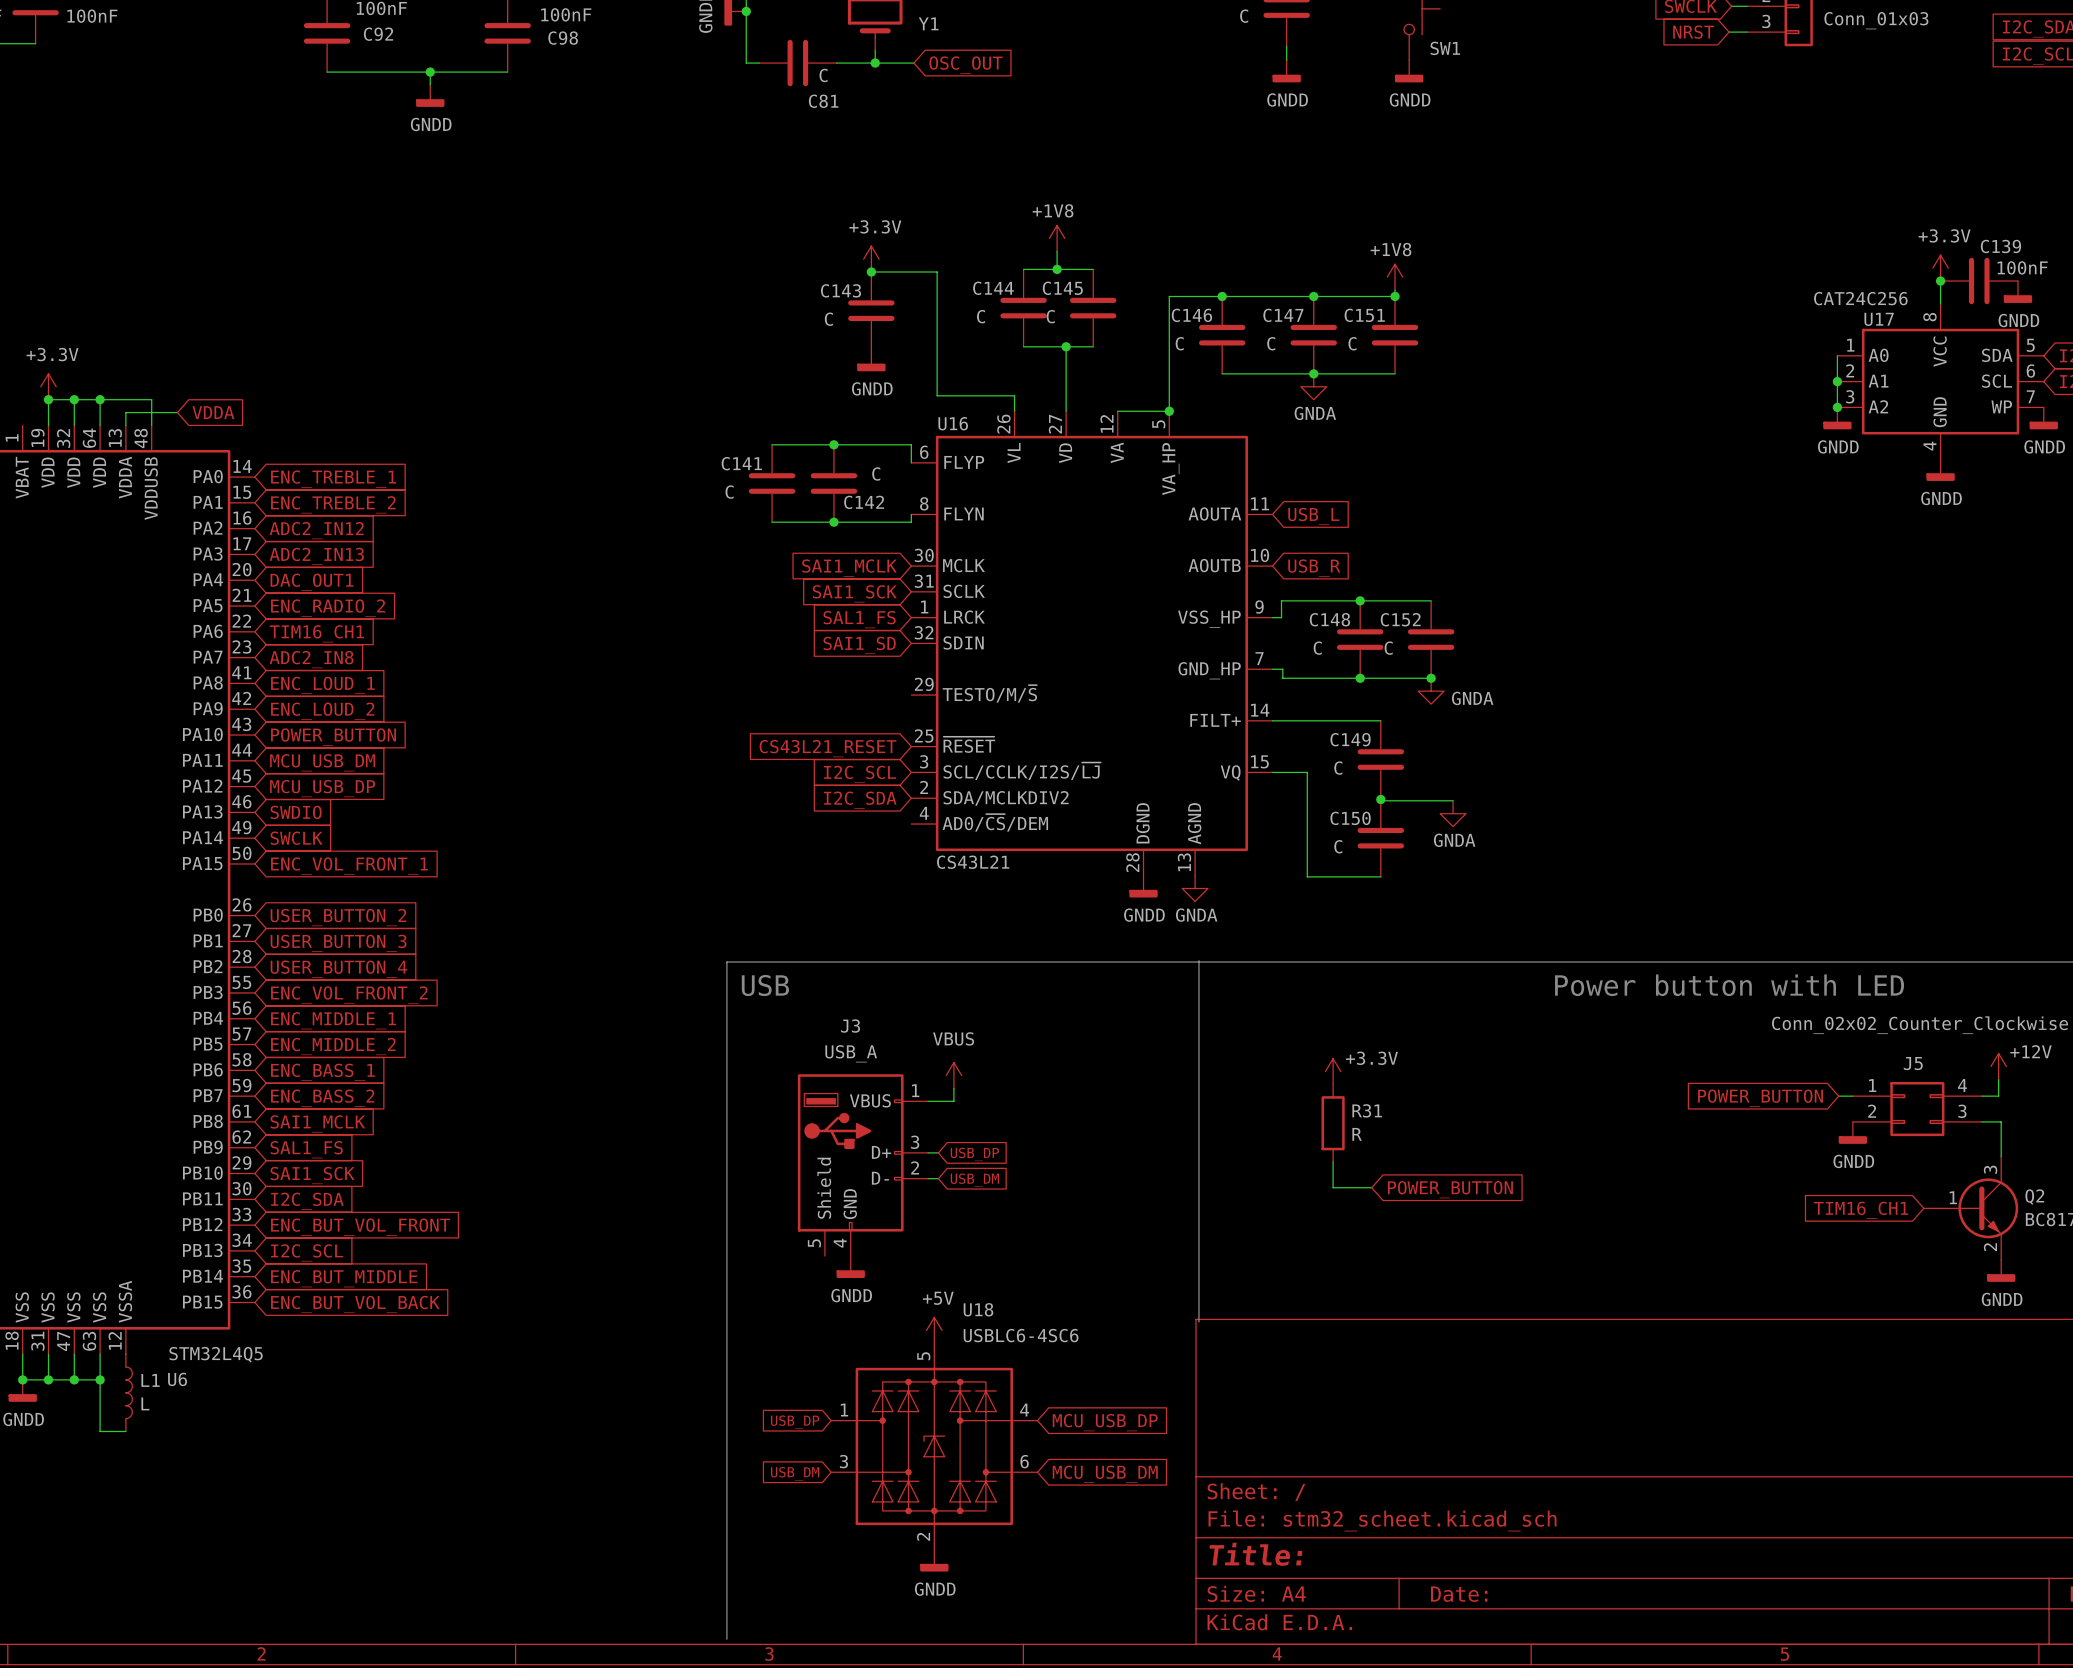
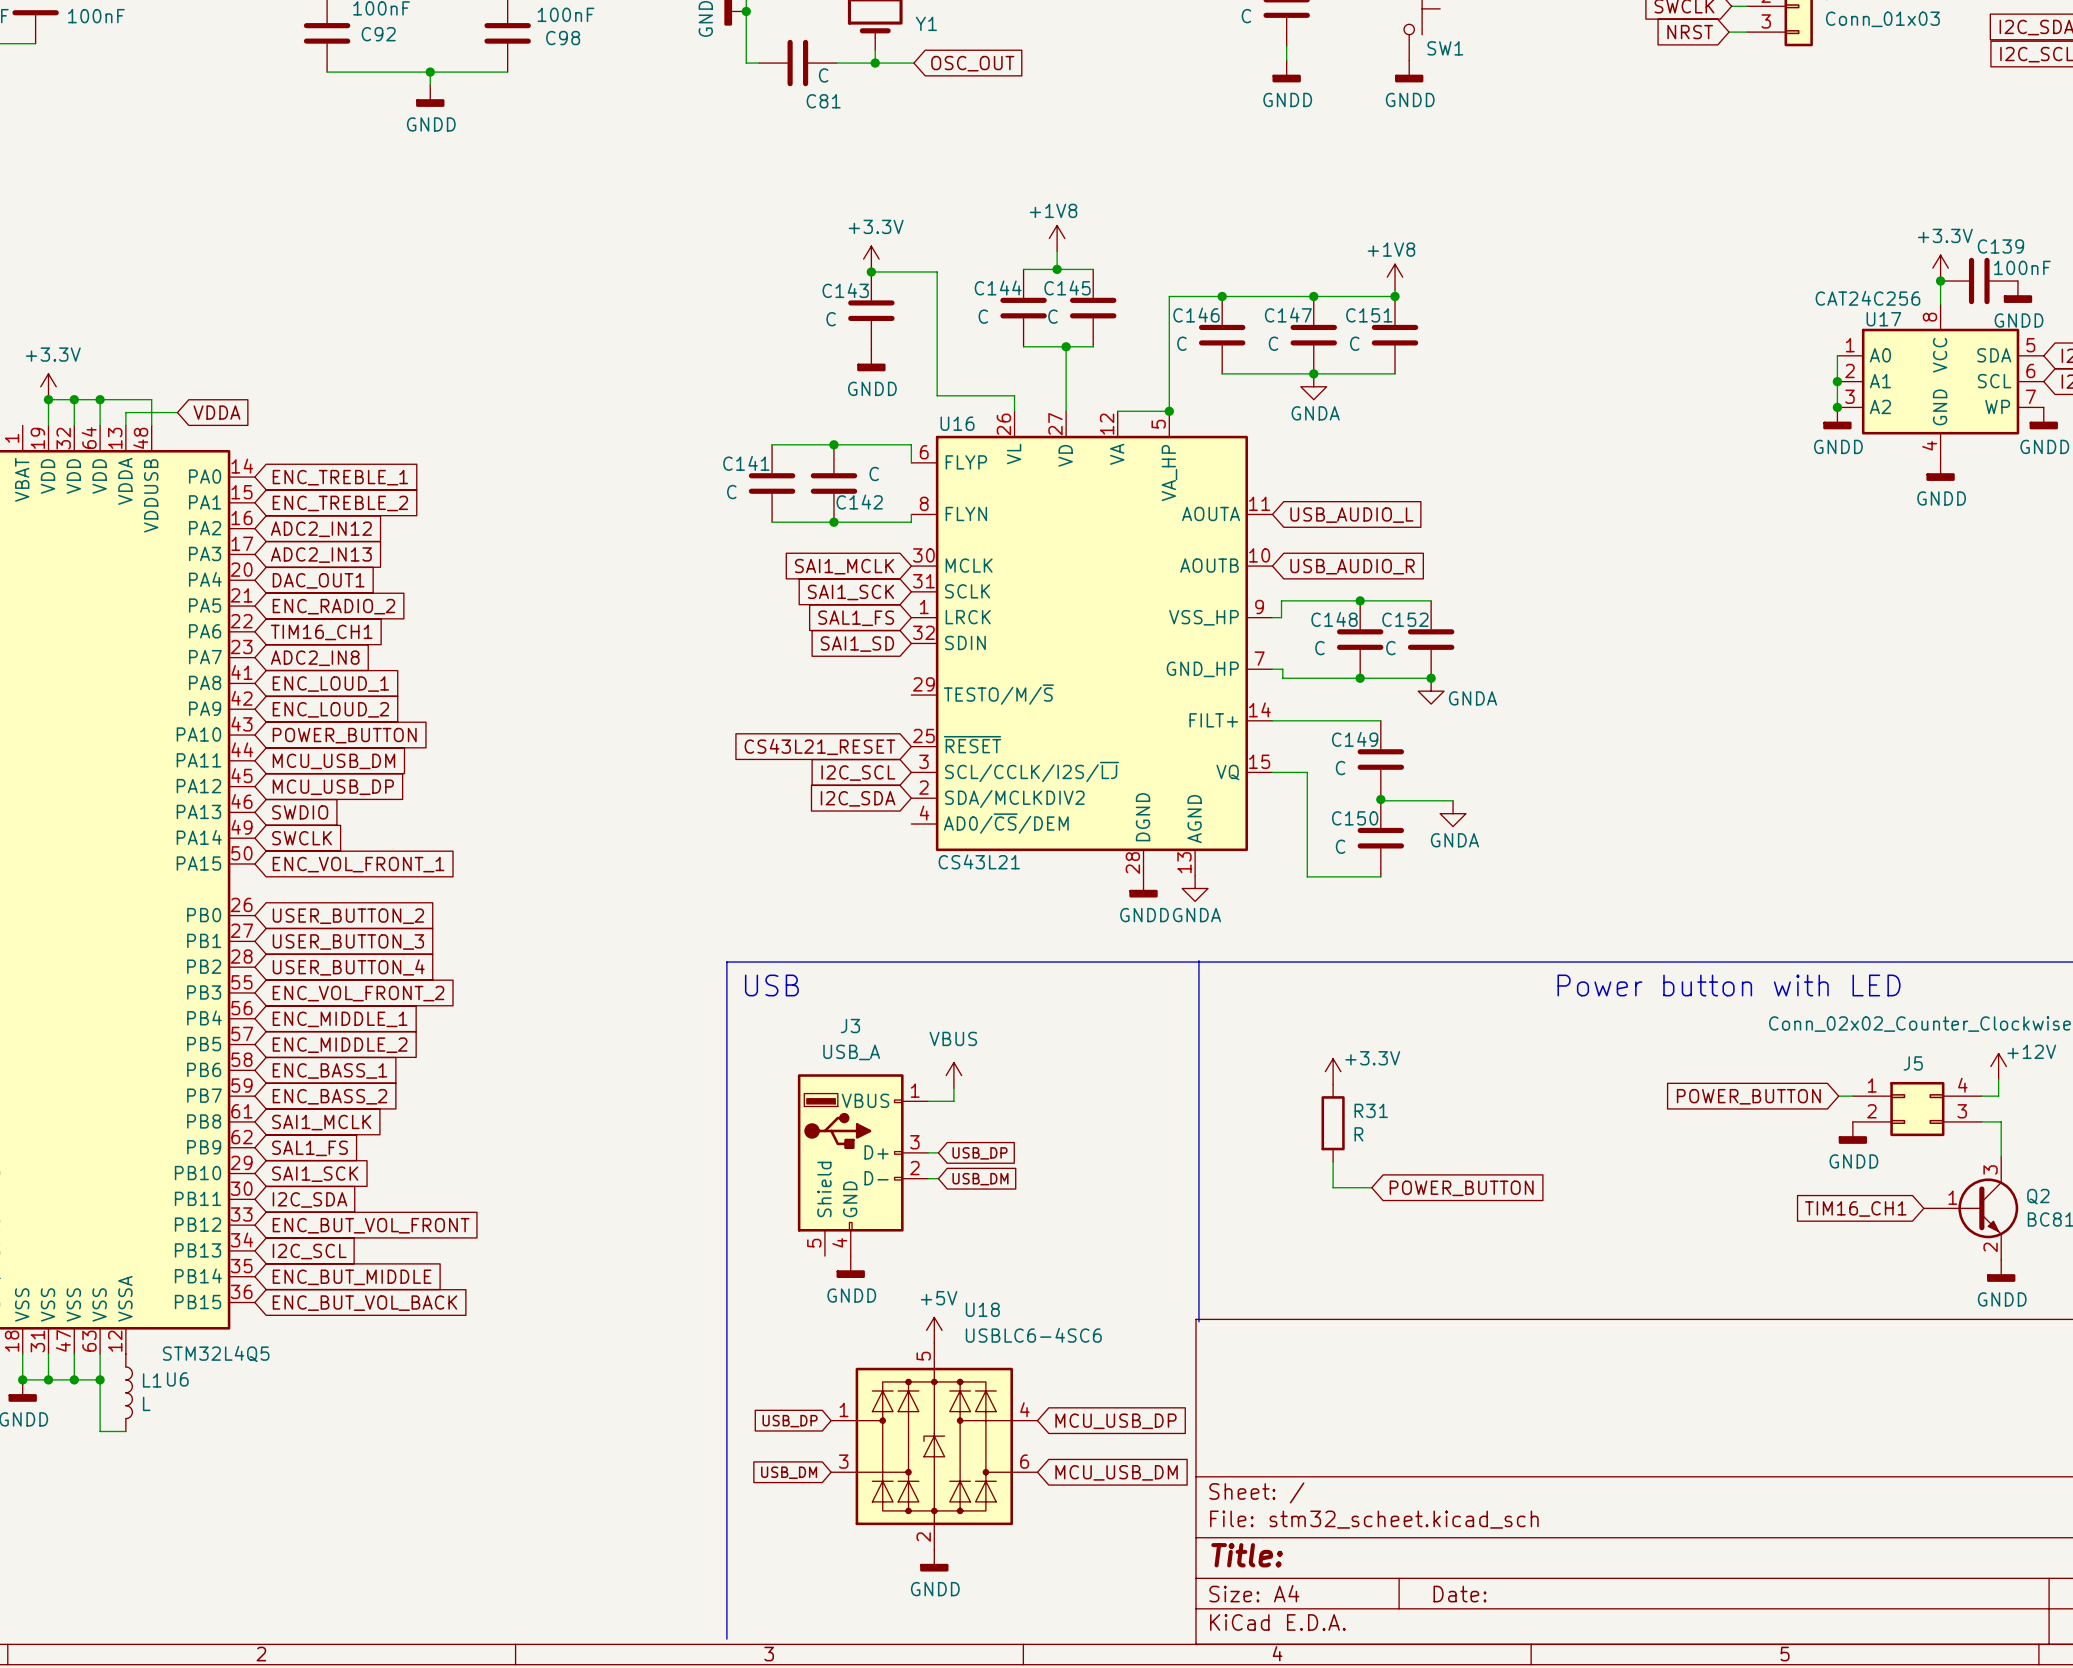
global label: USB_L (1313, 516) -> USB_AUDIO_L (1351, 515)
global label: USB_R (1314, 568) -> USB_AUDIO_R (1352, 566)

